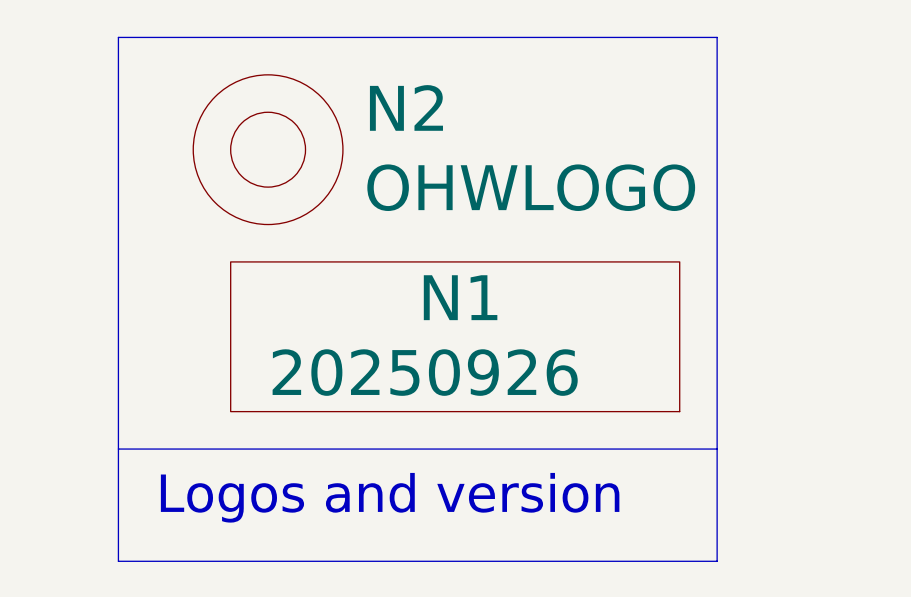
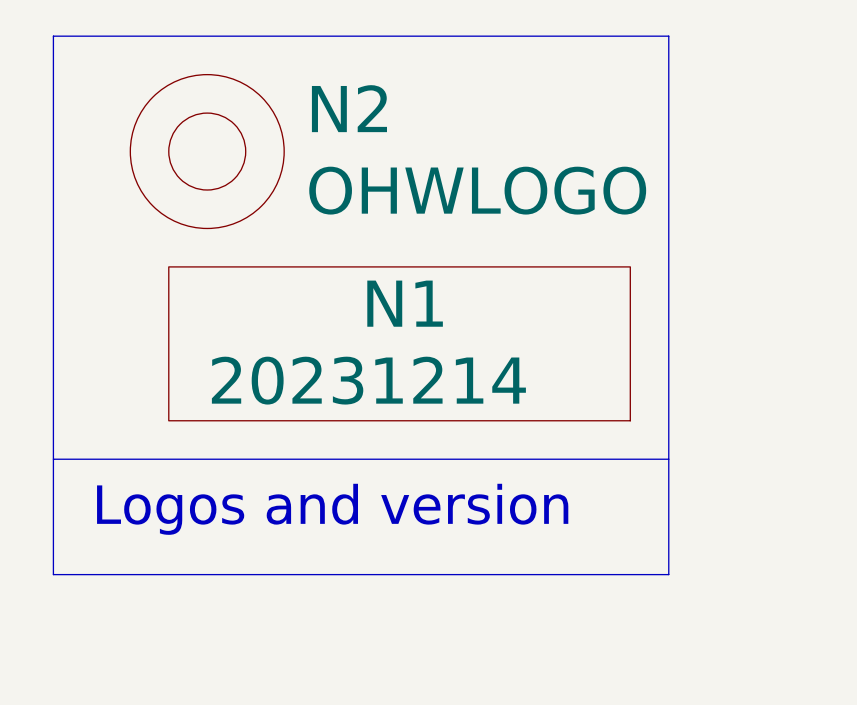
N1 value: 20250926 (425, 372) -> 20231214 (368, 380)

